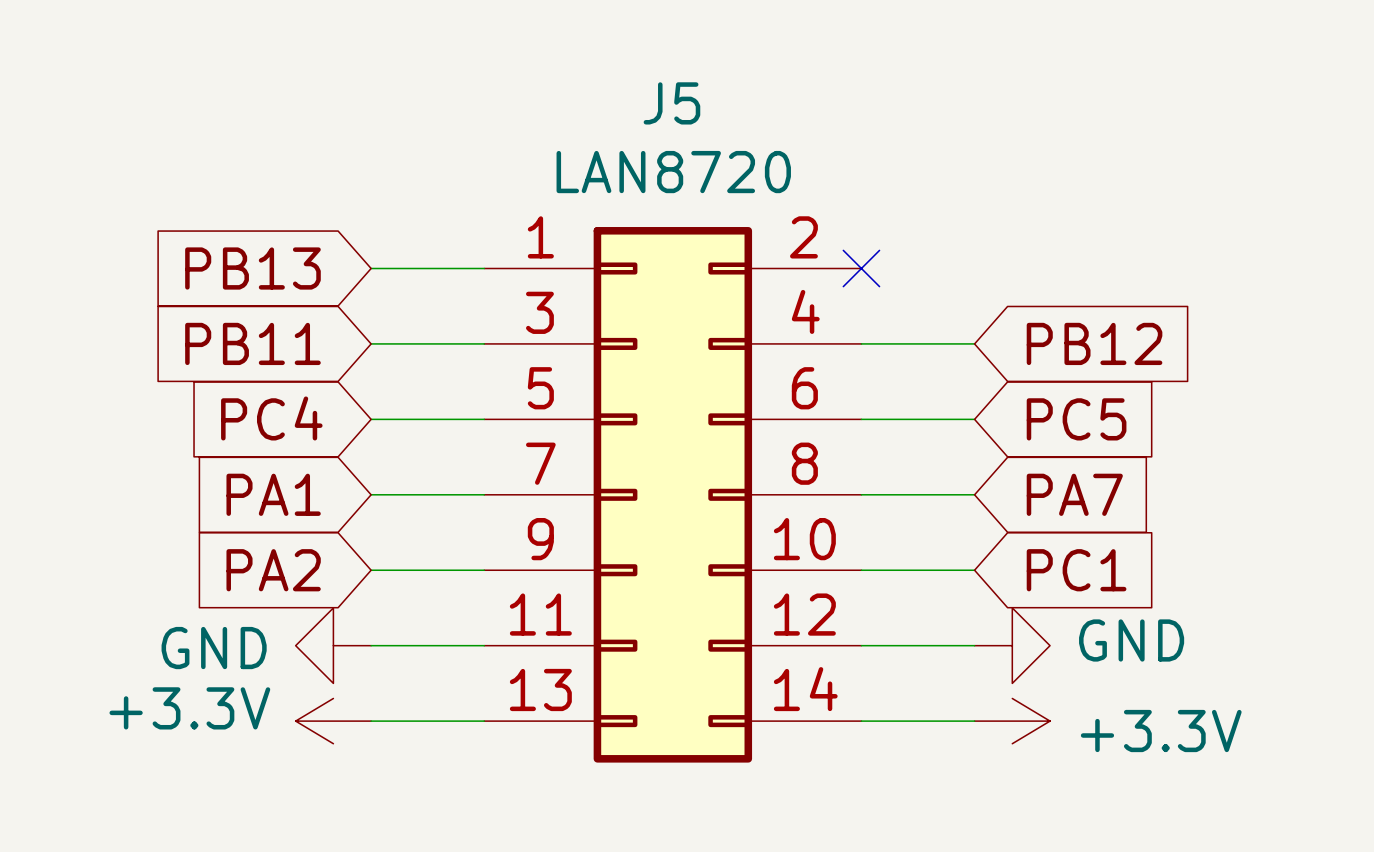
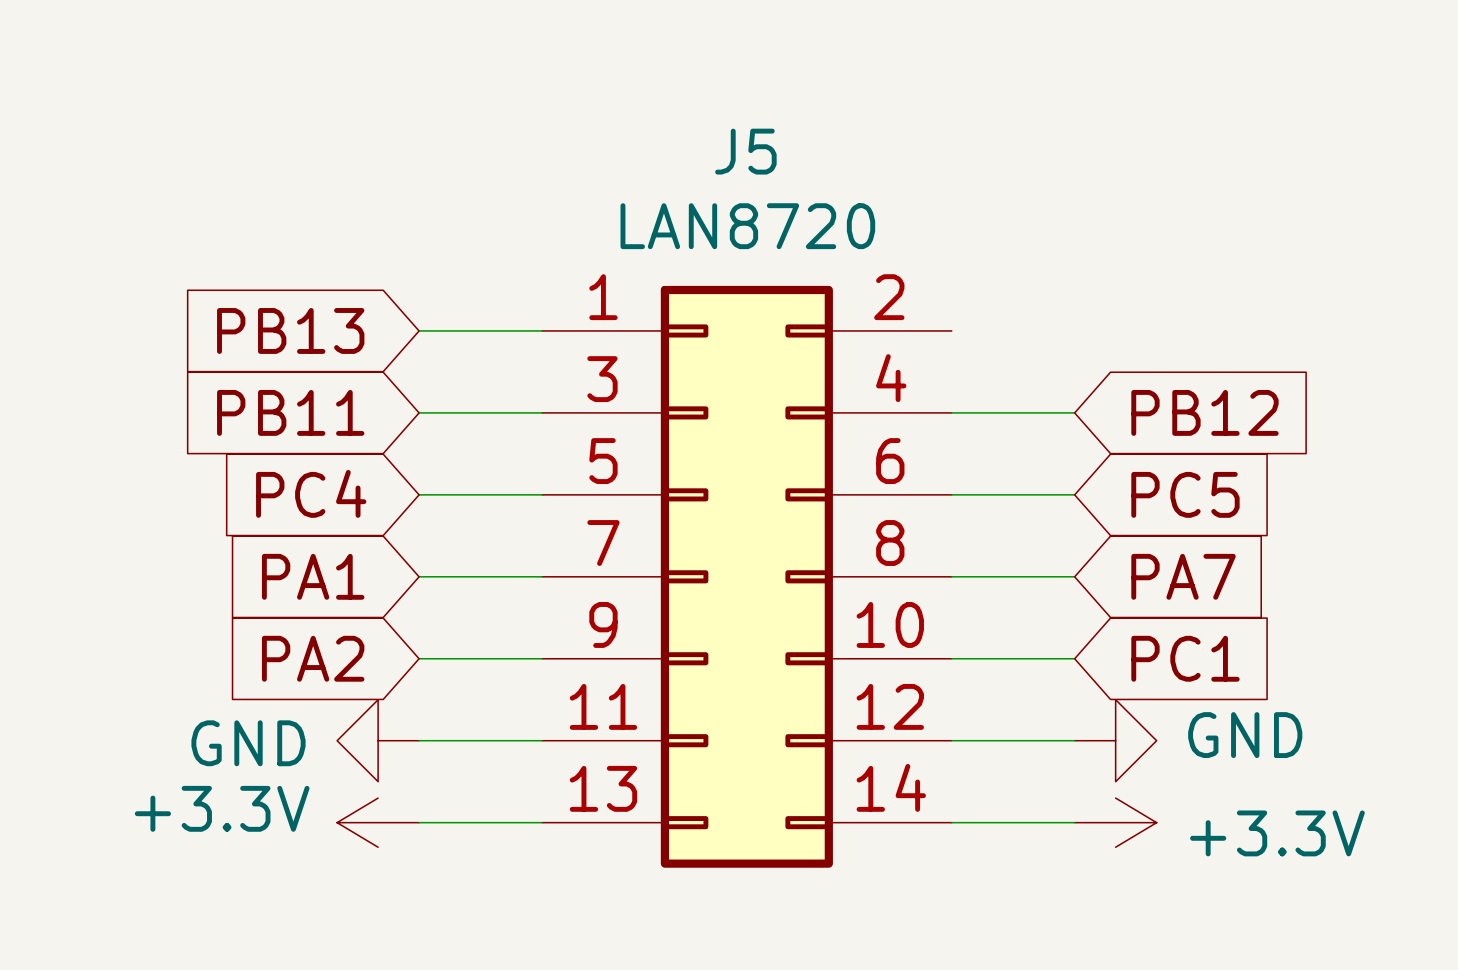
no-connect mark: (861, 268) -> none

